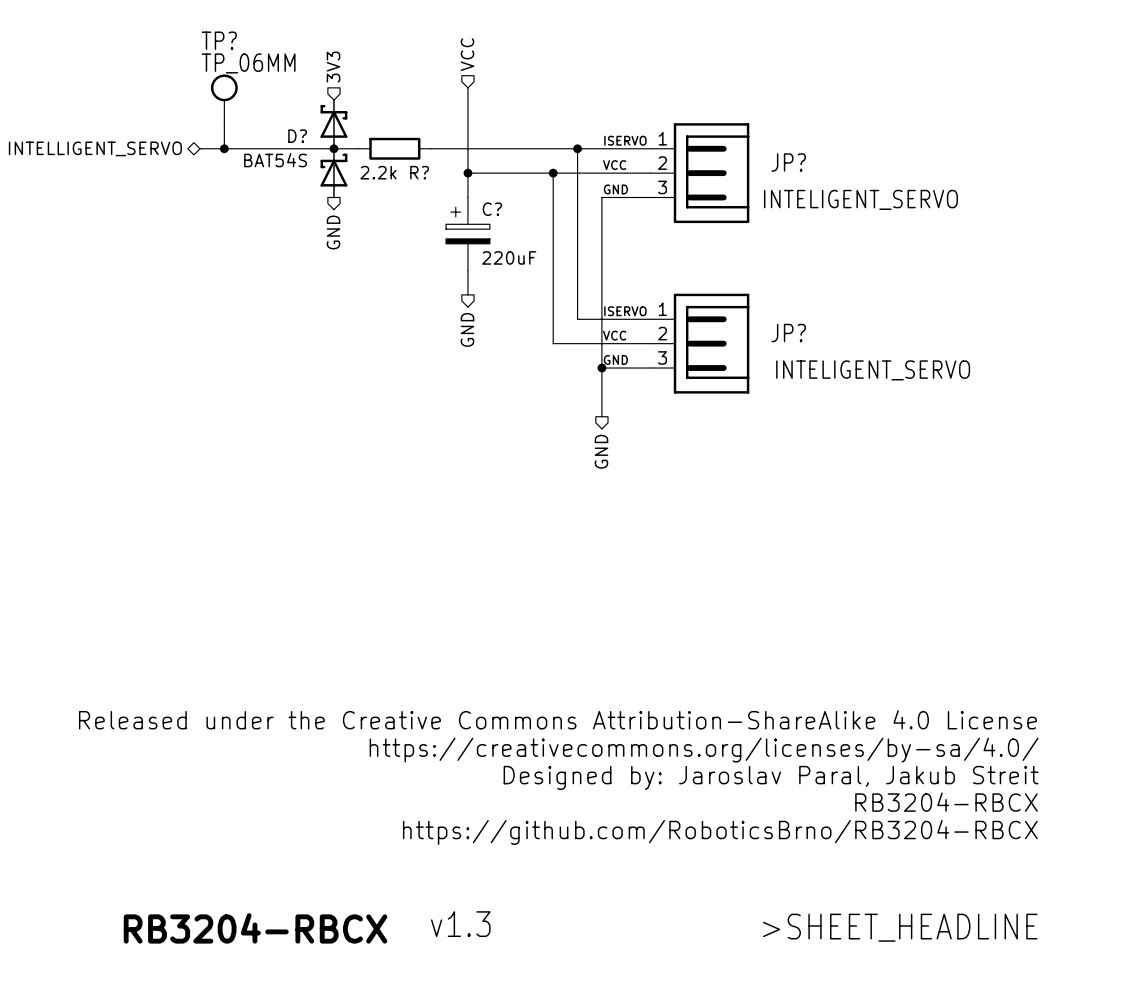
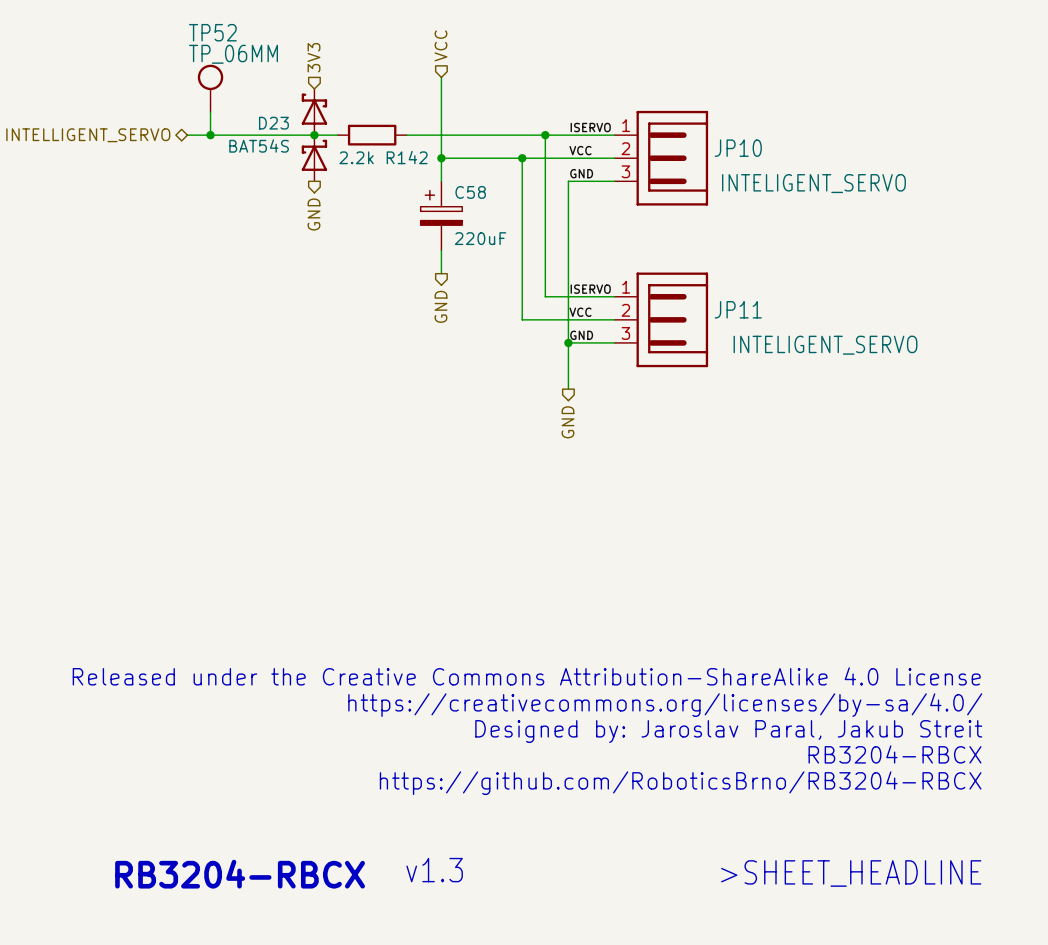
TP? name: TP? (219, 40) -> TP52 (212, 32)
D? name: D? (297, 136) -> D23 (273, 123)
JP? name: JP? (788, 162) -> JP10 (738, 148)
R? name: R? (419, 172) -> R142 (407, 157)
C? name: C? (492, 209) -> C58 (470, 192)
JP? name: JP? (788, 333) -> JP11 (738, 309)

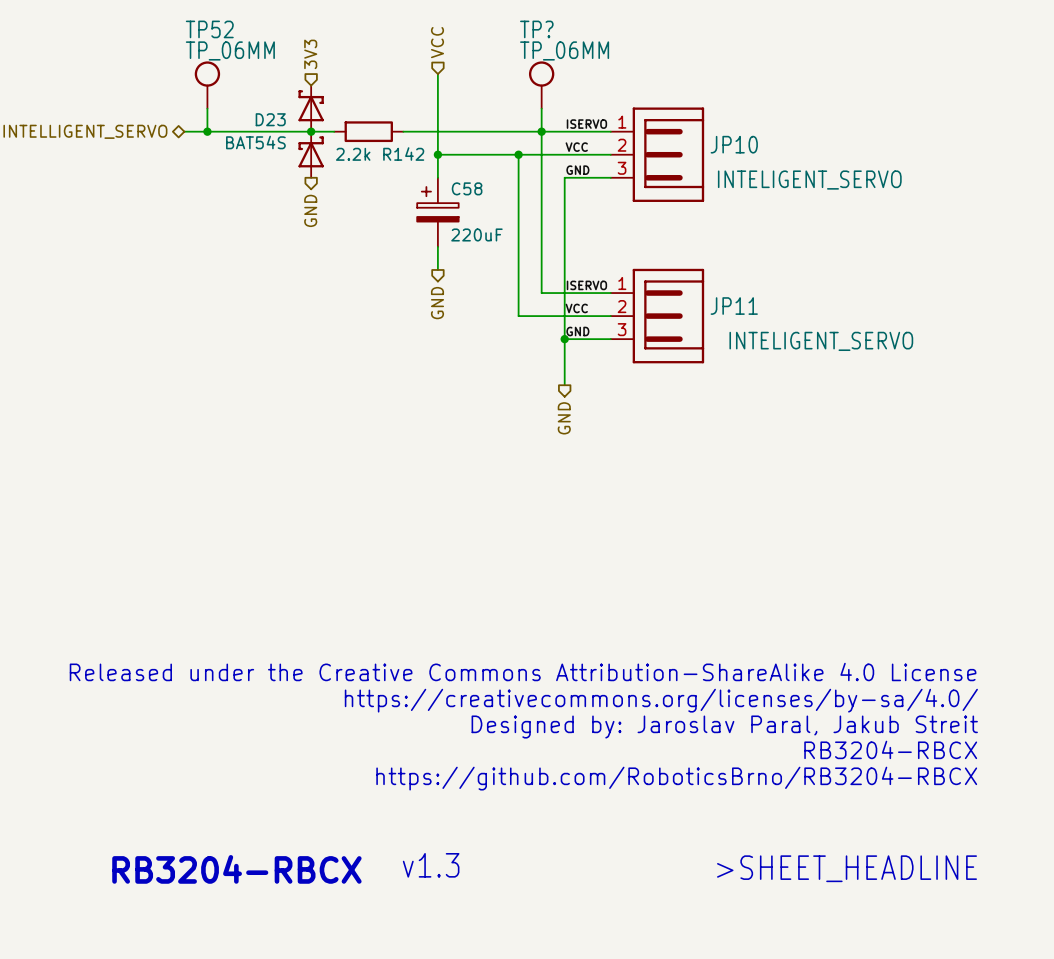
TP?: none -> TP_06MM (541, 85)
wire: none -> (541, 108) (541, 131)

